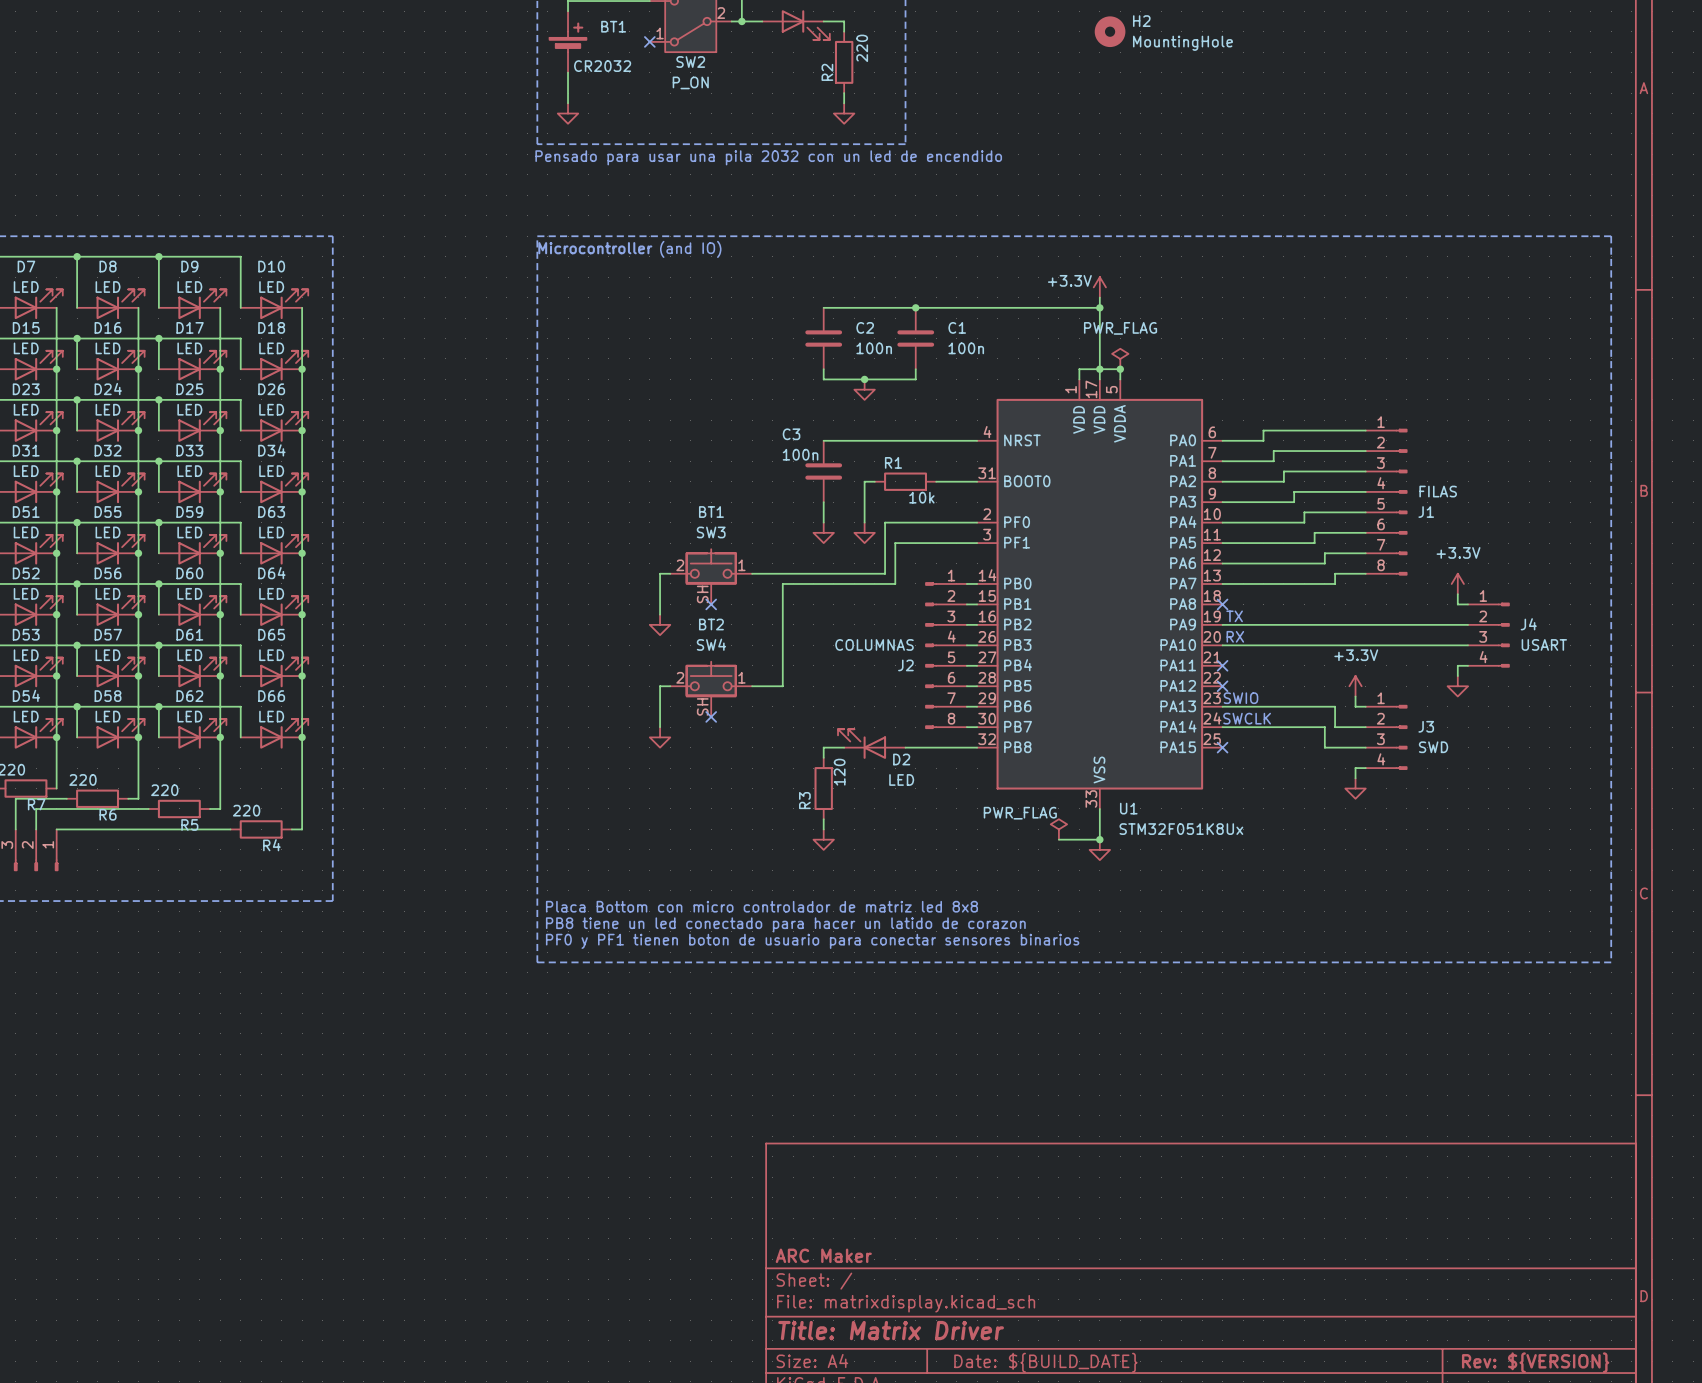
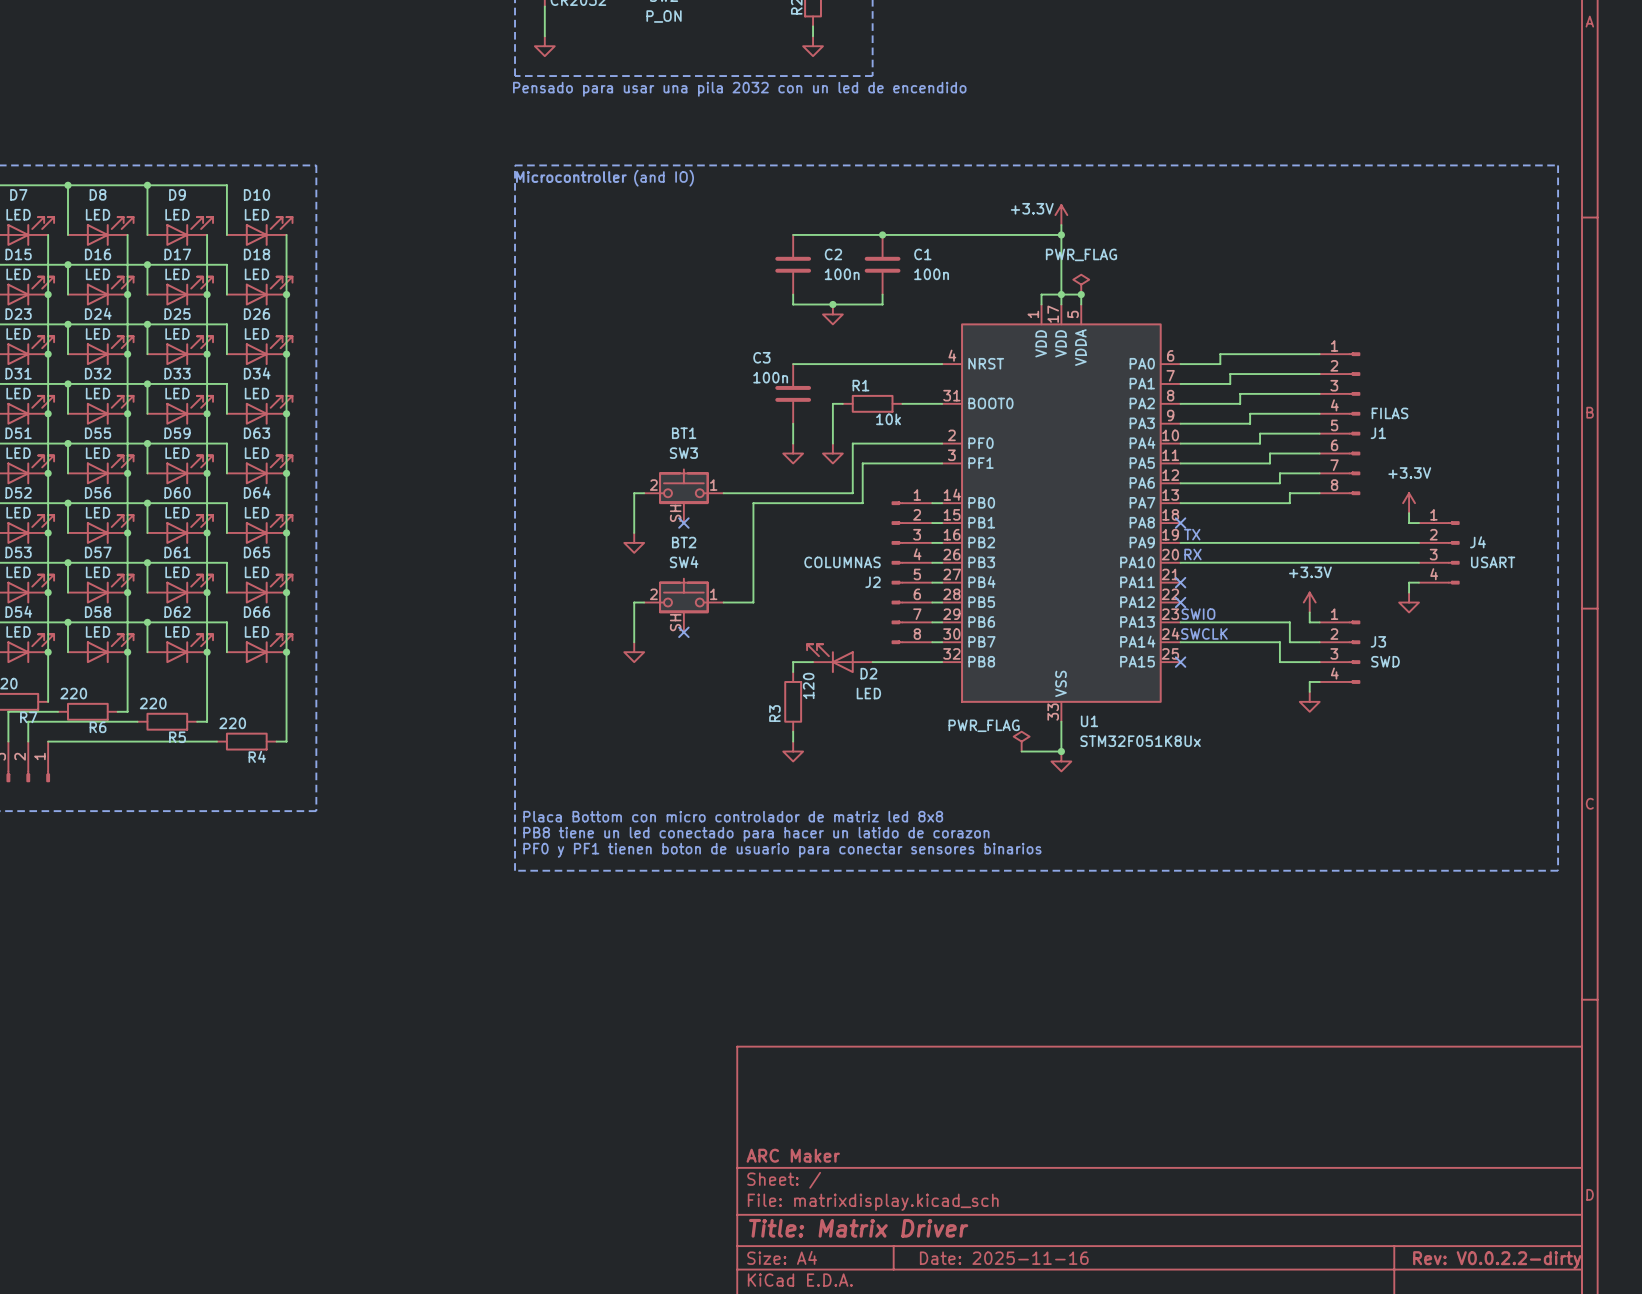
title block: Date: ${BUILD_DATE} (1045, 1362) -> Date: 2025-11-16 (1004, 1258)
title block: Rev: ${VERSION} (1535, 1362) -> Rev: V0.0.2.2-dirty (1497, 1260)

